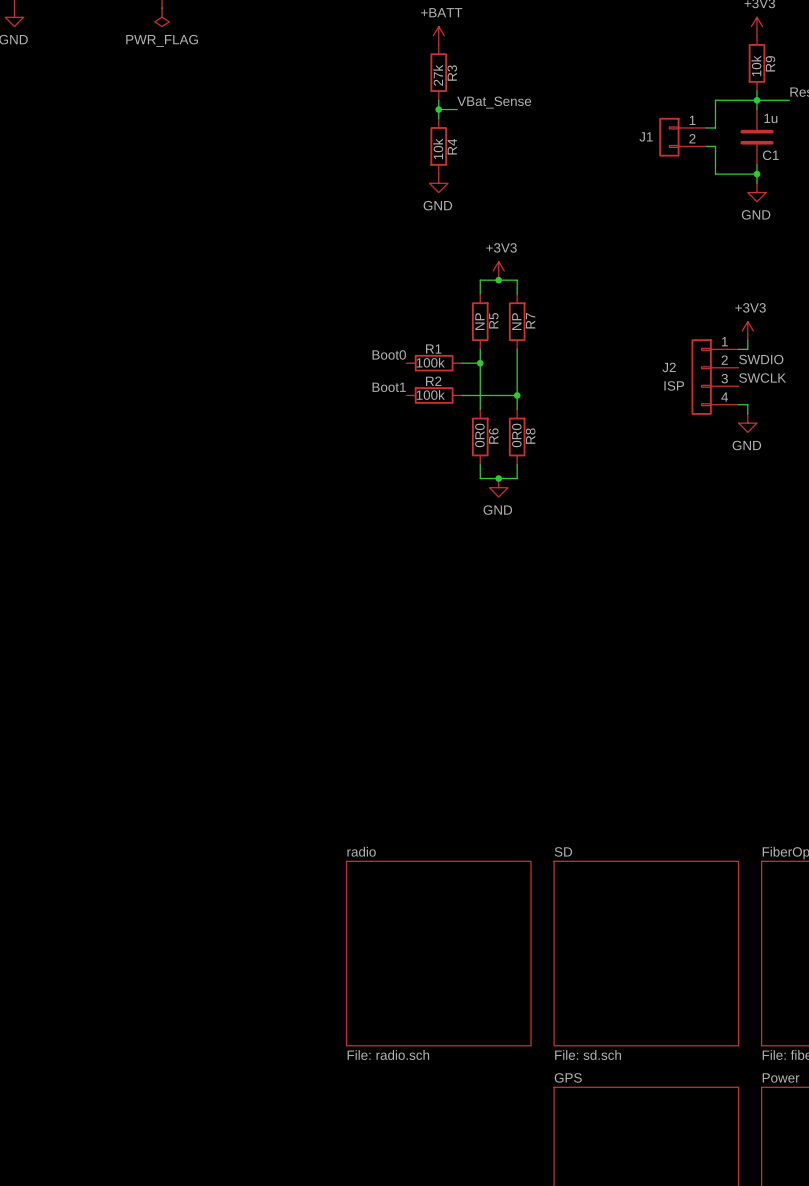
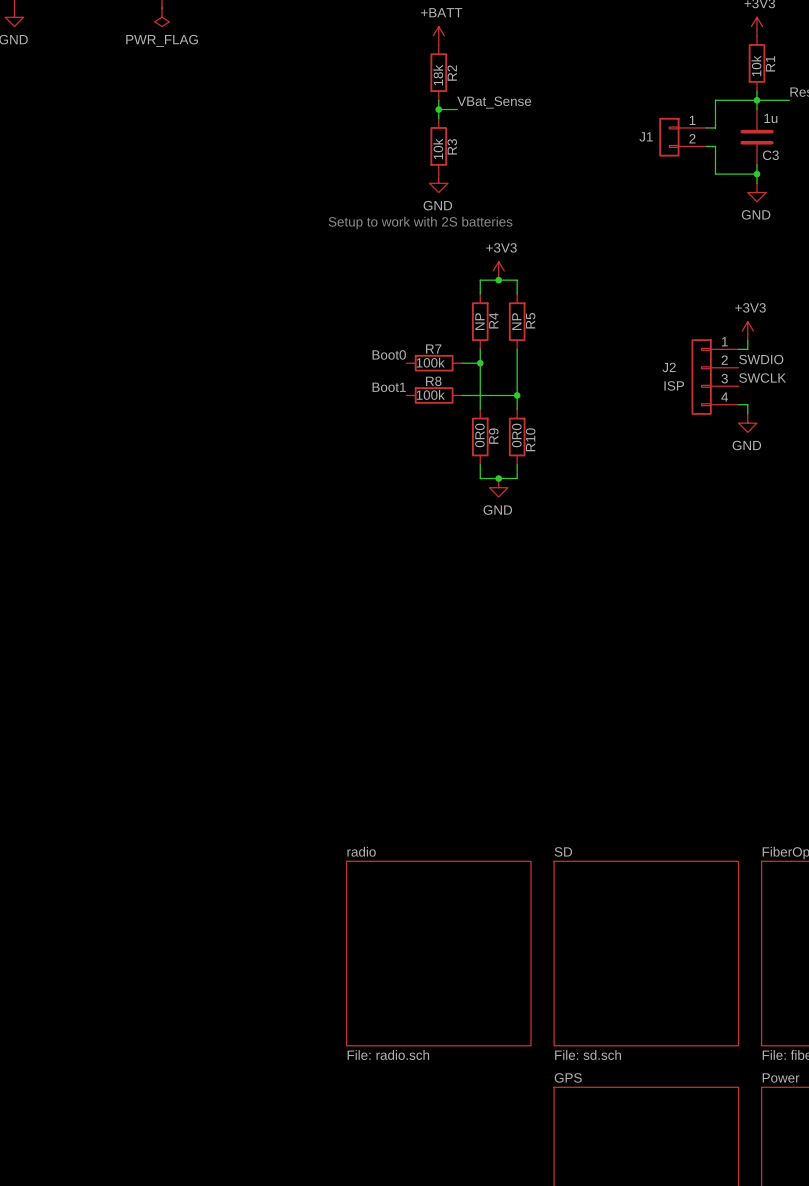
R9 name: R9 (770, 63) -> R1 (770, 63)
R3 name: R3 (452, 73) -> R2 (452, 73)
R3 value: 27k (438, 75) -> 18k (438, 75)
R4 name: R4 (452, 146) -> R3 (452, 146)
C1 name: C1 (770, 155) -> C3 (770, 155)
text: none -> Setup to work with 2S batteries (420, 223)
R5 name: R5 (493, 320) -> R4 (493, 320)
R7 name: R7 (530, 320) -> R5 (530, 320)
R1 name: R1 (433, 349) -> R7 (433, 349)
R2 name: R2 (433, 381) -> R8 (433, 381)
R6 name: R6 (493, 436) -> R9 (493, 436)
R8 name: R8 (530, 436) -> R10 (530, 439)

